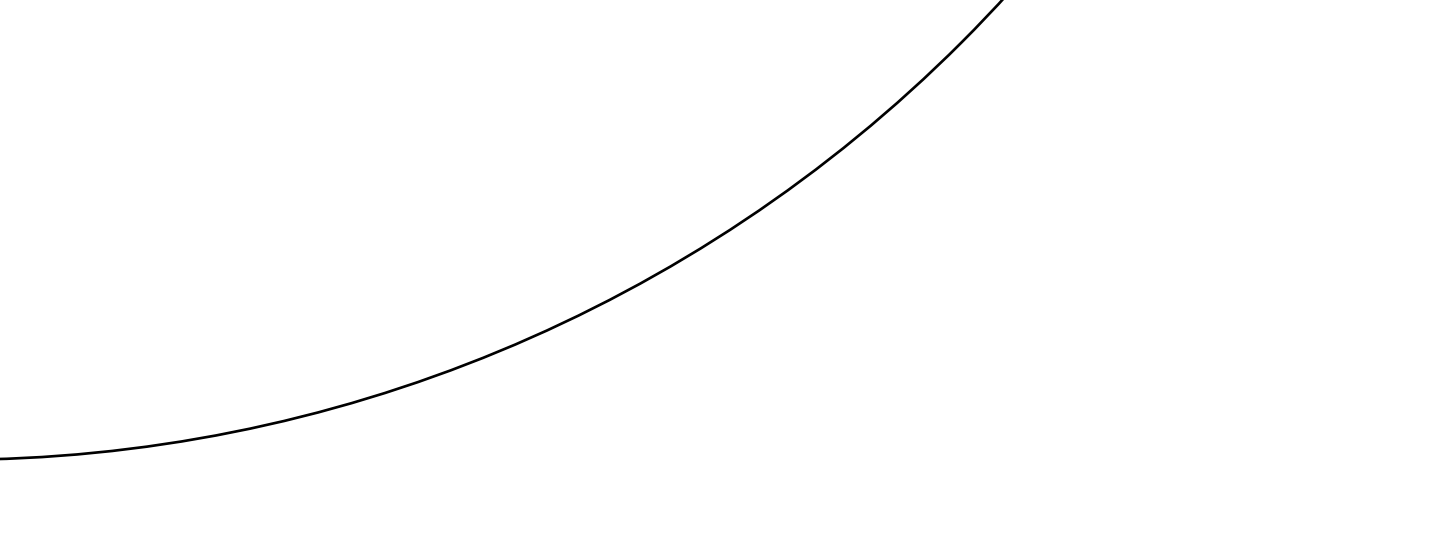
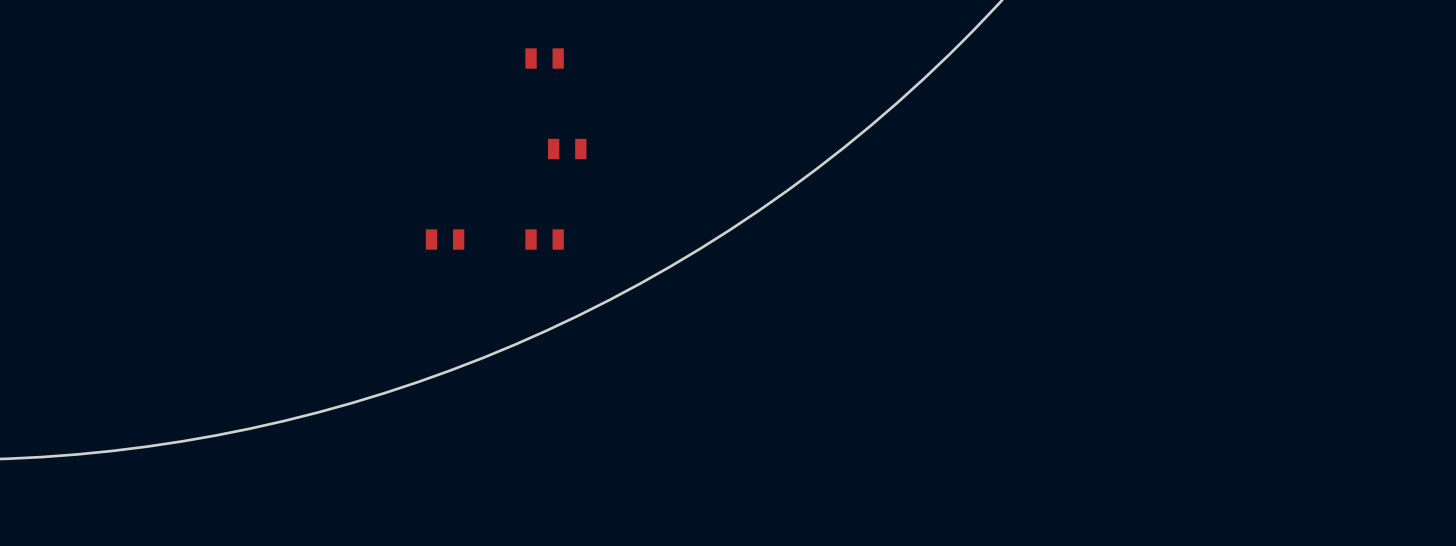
part: none -> (544, 58)
part: none -> (567, 149)
part: none -> (445, 239)
part: none -> (544, 239)

